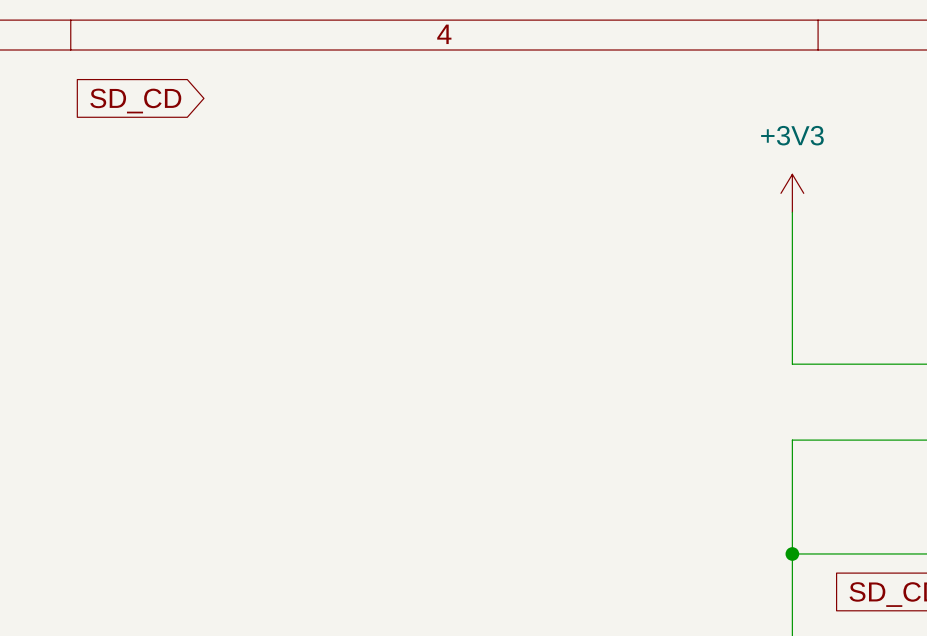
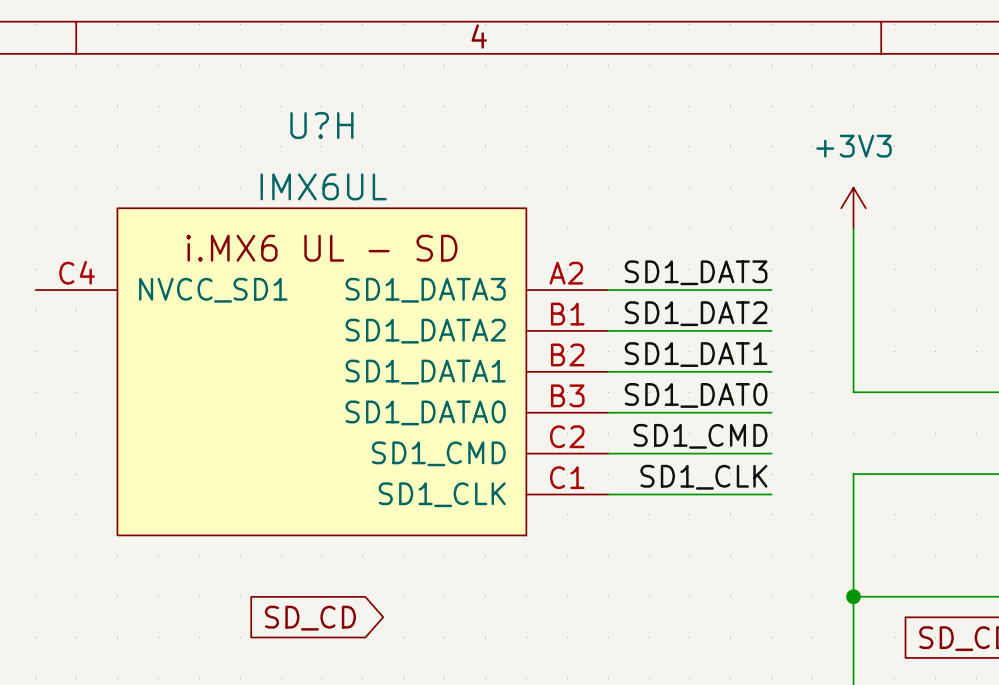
global label: SD_CD (135, 101) -> none
label: none -> SD1_DAT3 (696, 272)
wire: none -> (608, 290) (771, 290)
label: none -> SD1_DAT2 (696, 313)
wire: none -> (608, 330) (771, 330)
label: none -> SD1_DAT1 (696, 354)
U?H: none -> IMX6UL (321, 371)
wire: none -> (608, 371) (771, 371)
label: none -> SD1_DAT0 (696, 395)
wire: none -> (608, 412) (771, 412)
label: none -> SD1_CMD (700, 436)
wire: none -> (608, 453) (771, 453)
label: none -> SD1_CLK (703, 477)
wire: none -> (608, 494) (771, 494)
global label: none -> SD_CD (310, 618)

